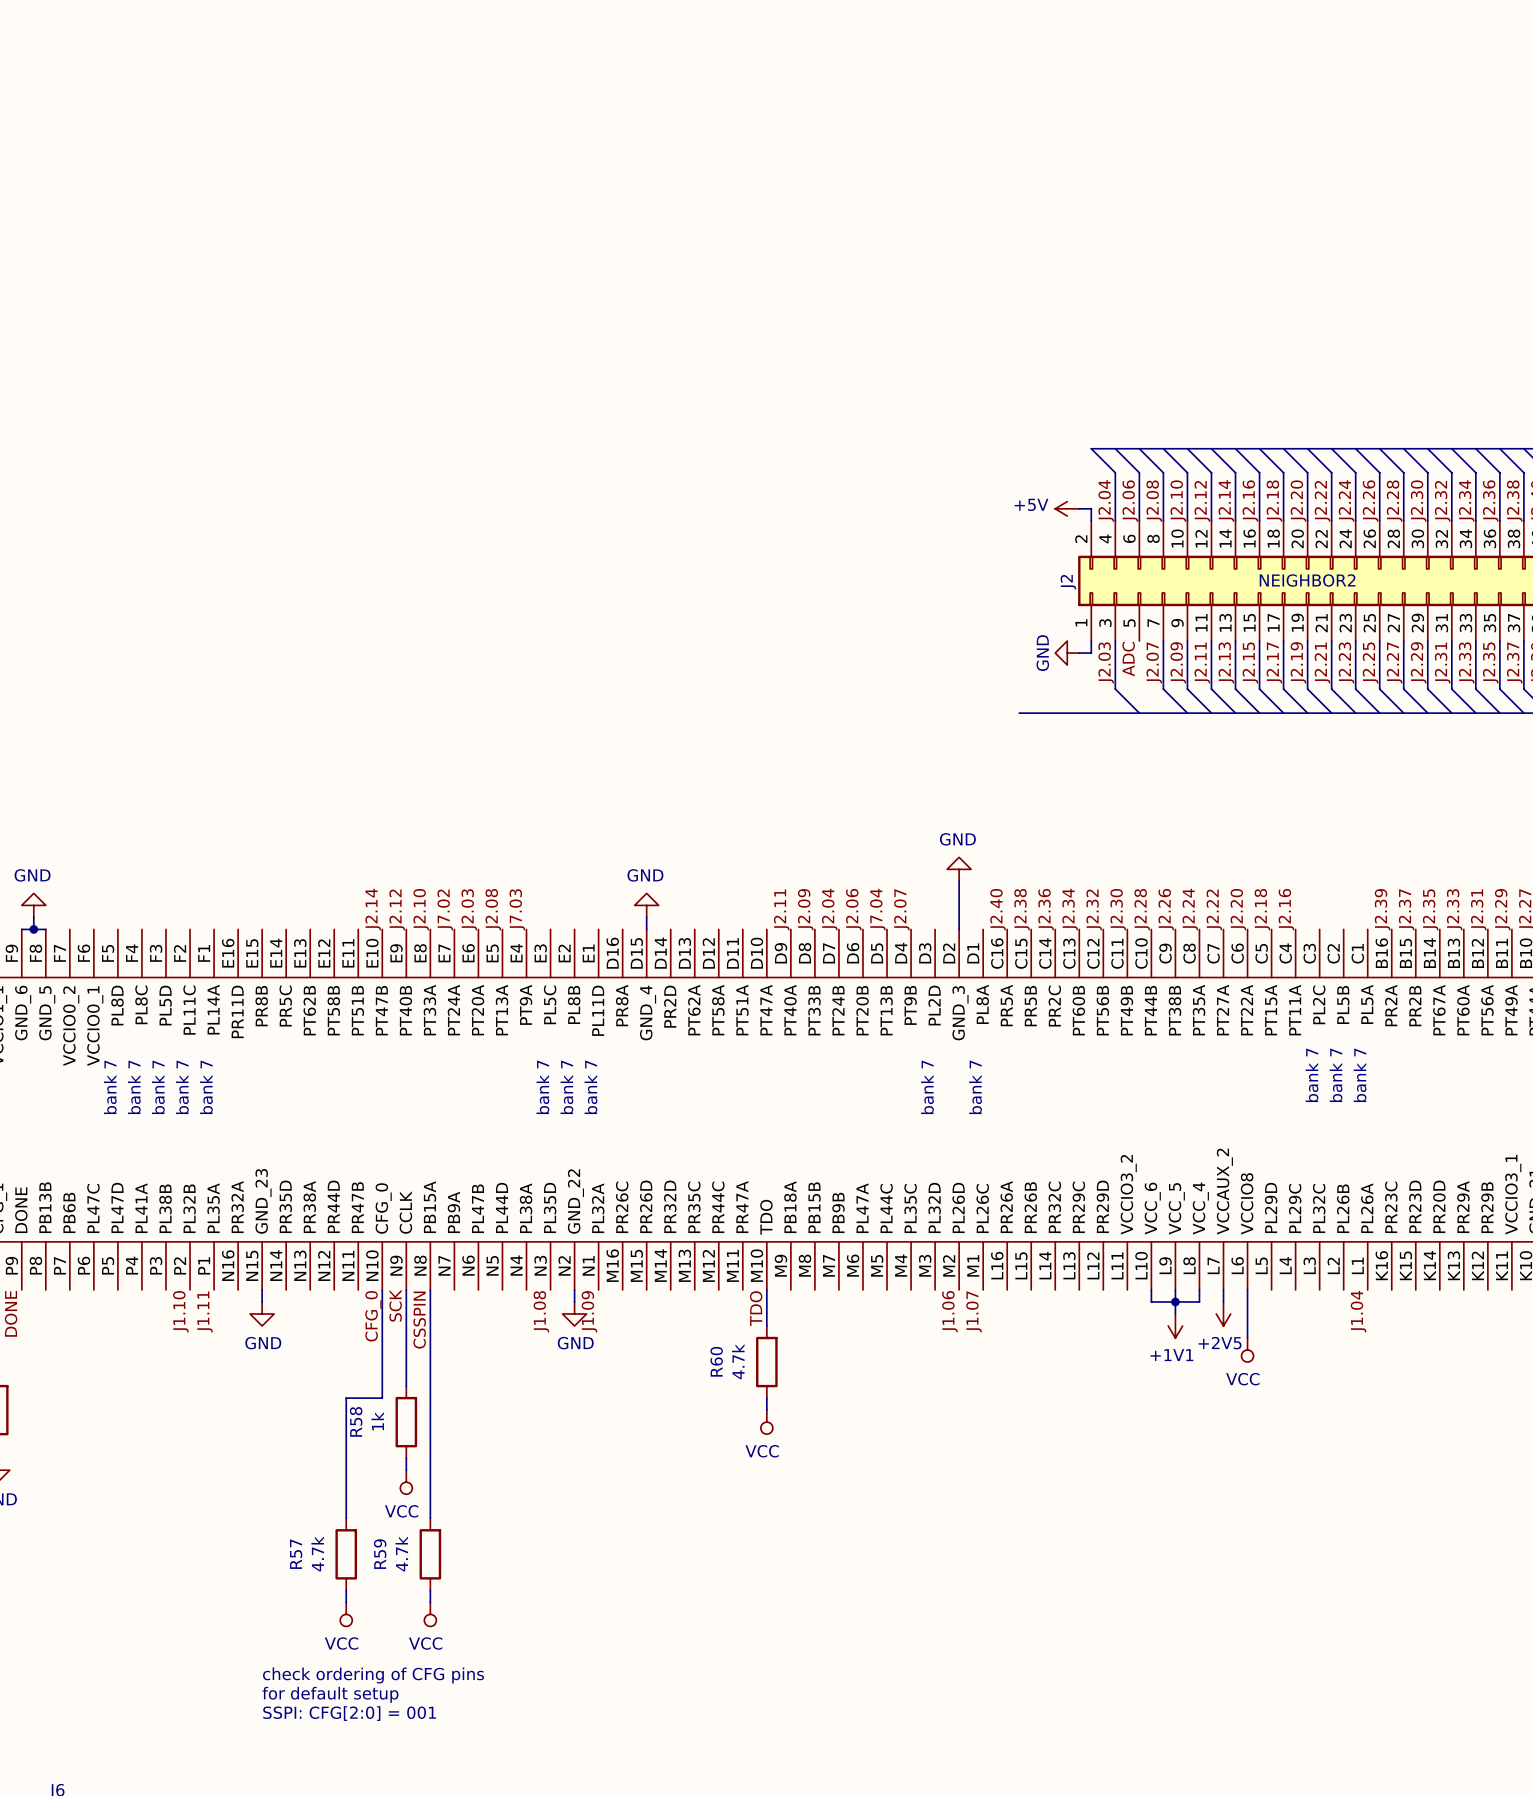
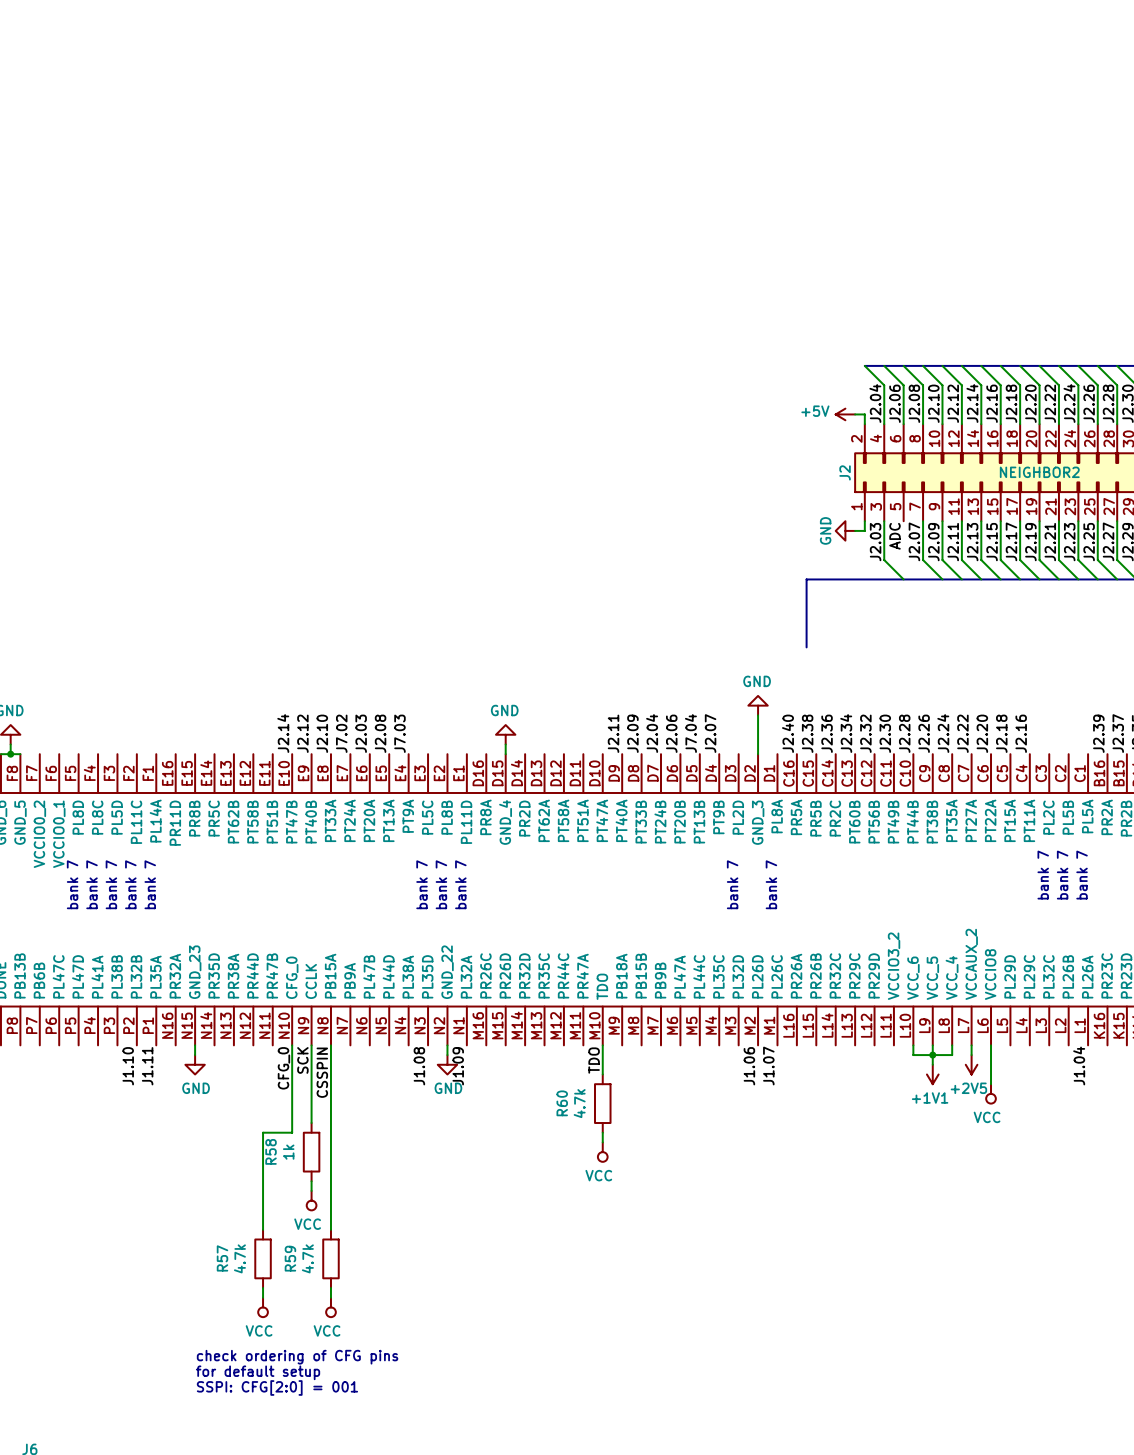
bus: none -> (806, 579) (806, 647)

